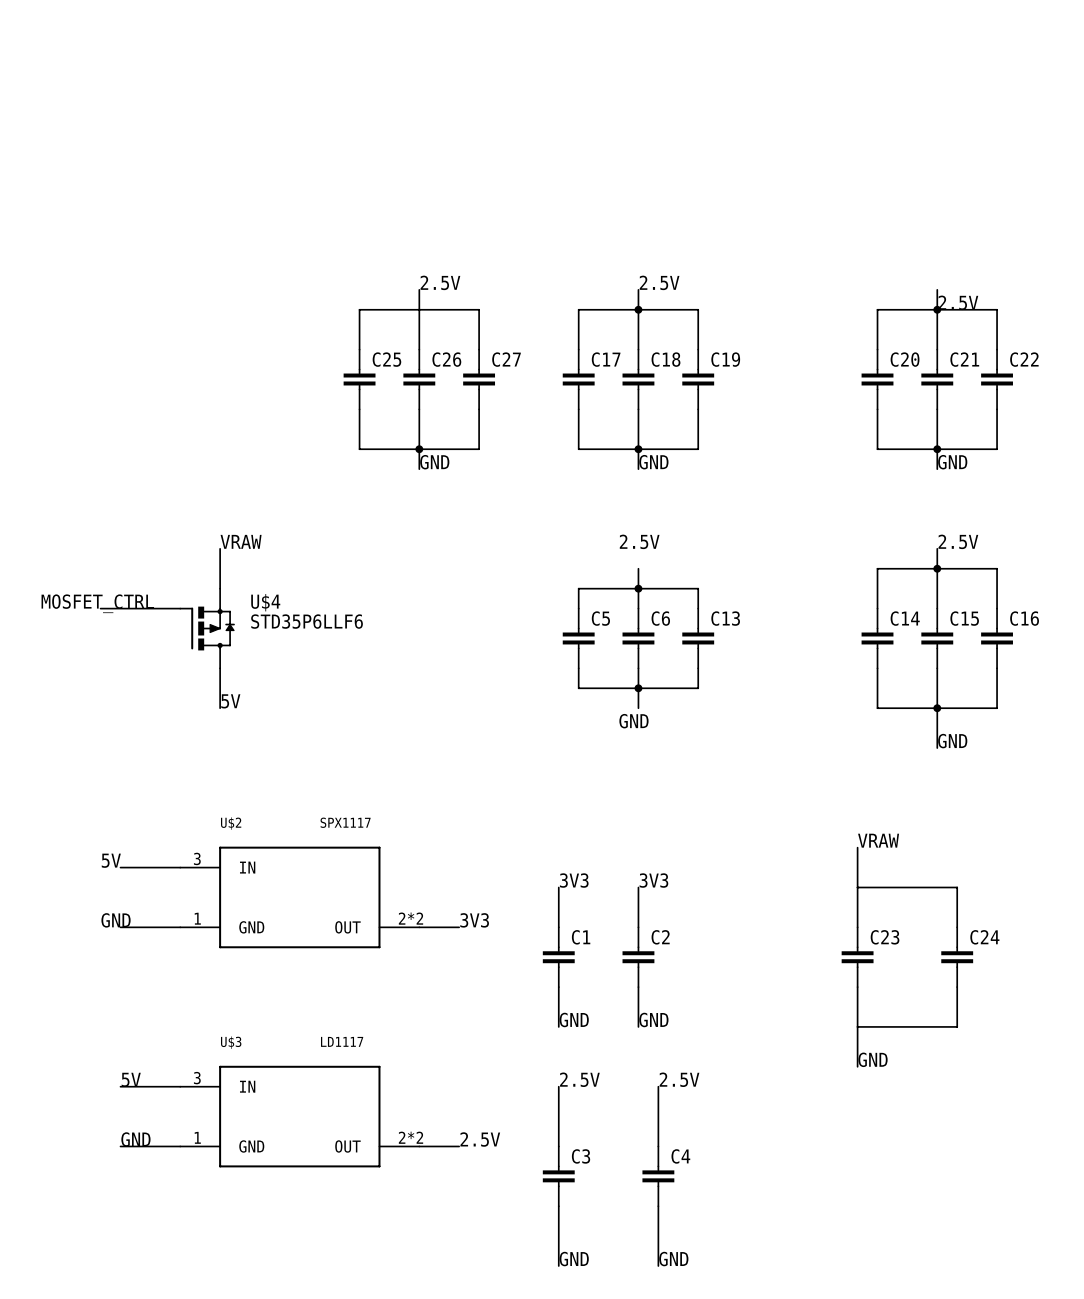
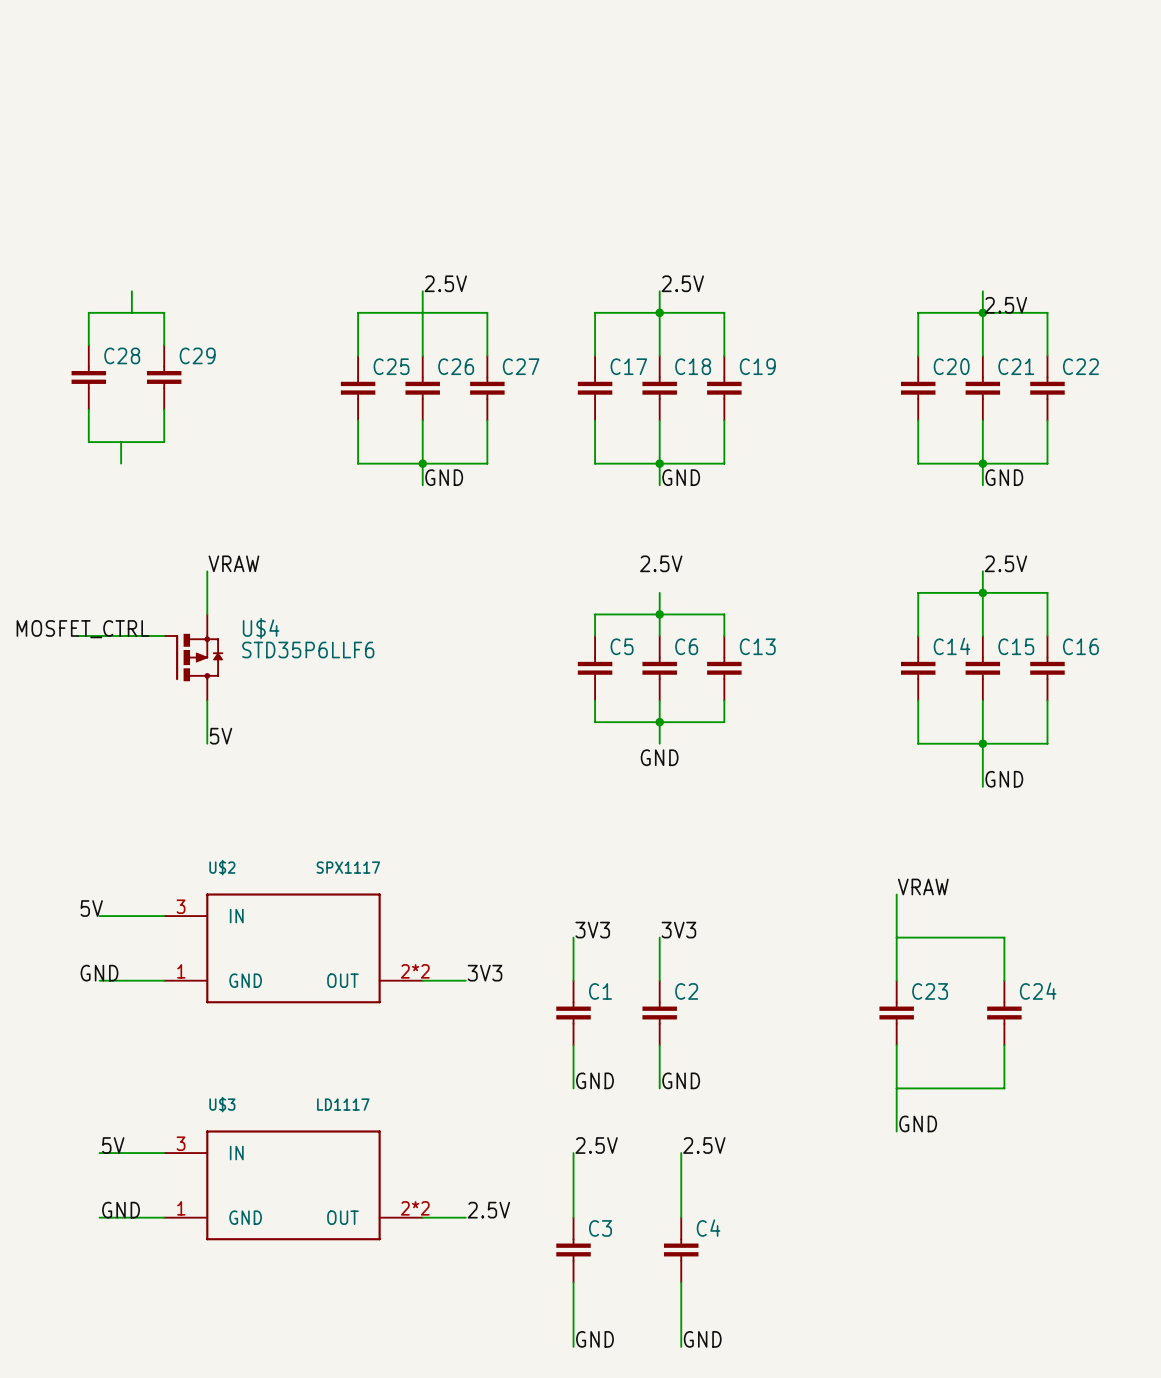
wire: none -> (131, 291) (131, 312)
wire: none -> (88, 345) (88, 312) (164, 312) (164, 345)
C28: none -> (88, 377)
C29: none -> (164, 377)
wire: none -> (88, 409) (88, 442) (164, 442) (164, 409)
wire: none -> (121, 442) (121, 463)

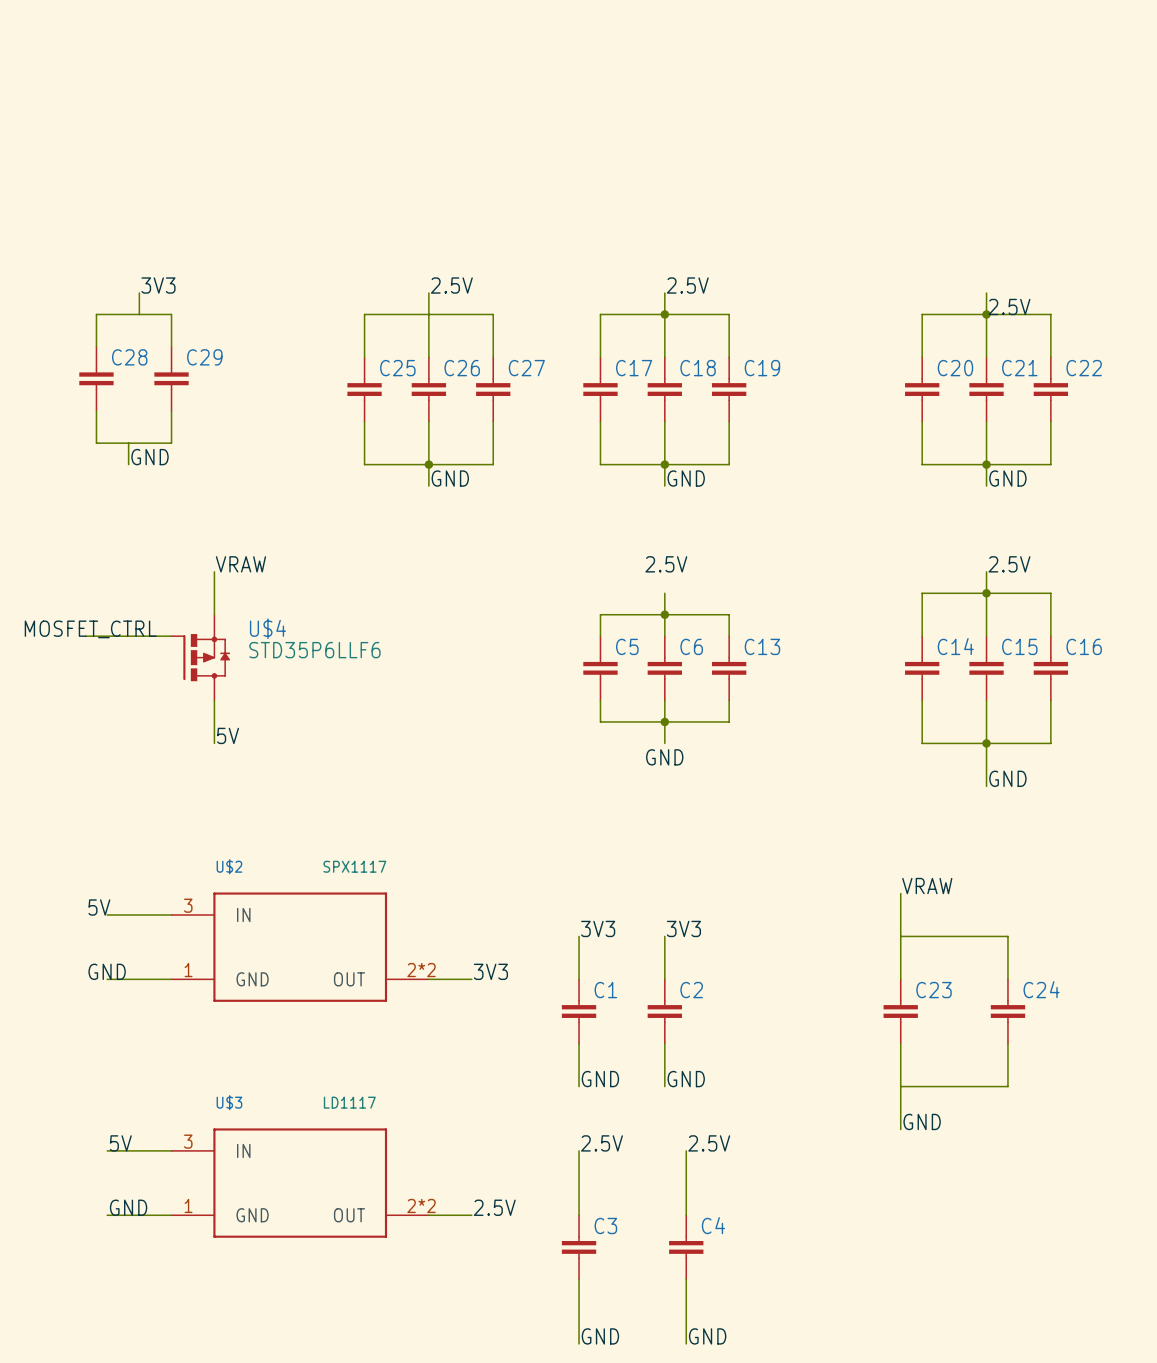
label: none -> 3V3 (158, 285)
label: none -> GND (150, 457)

